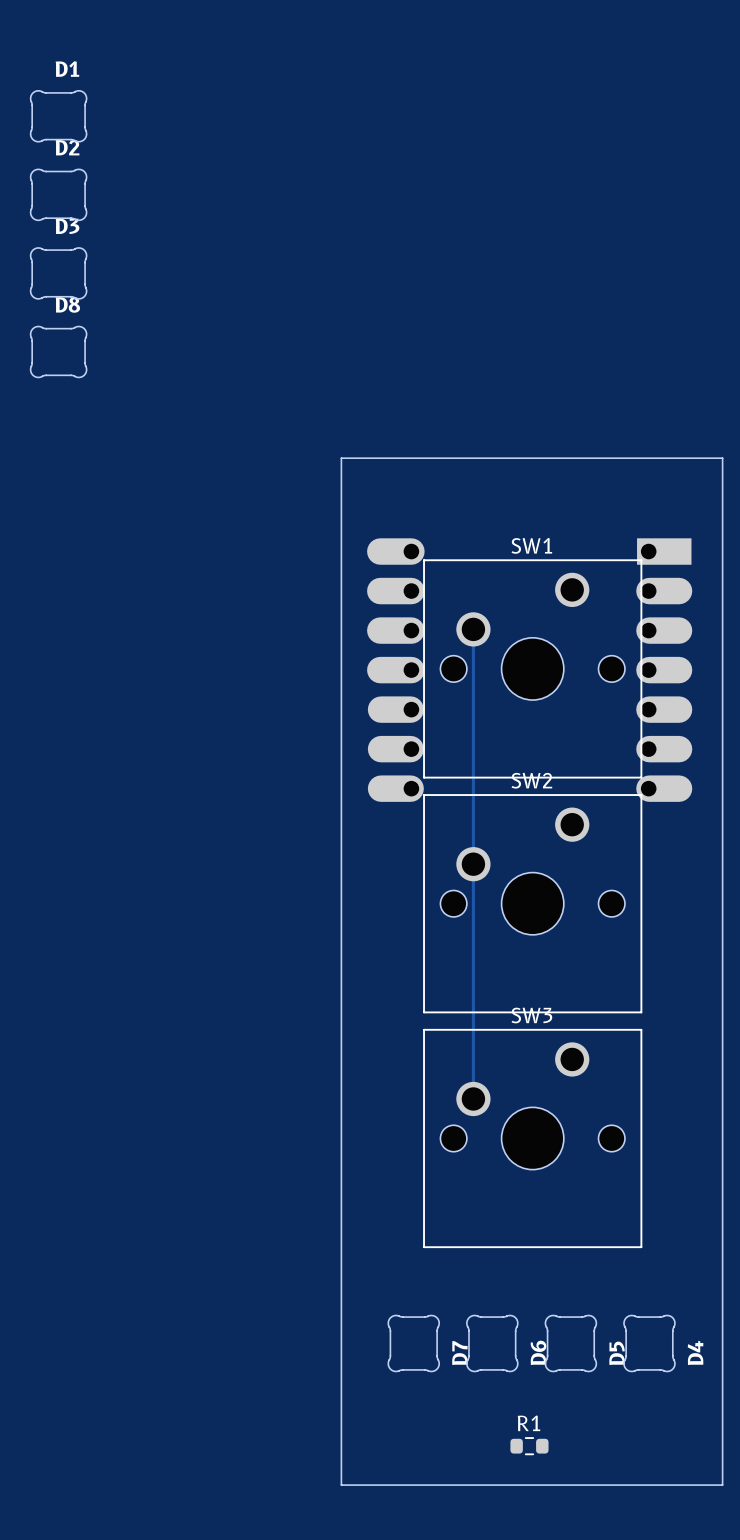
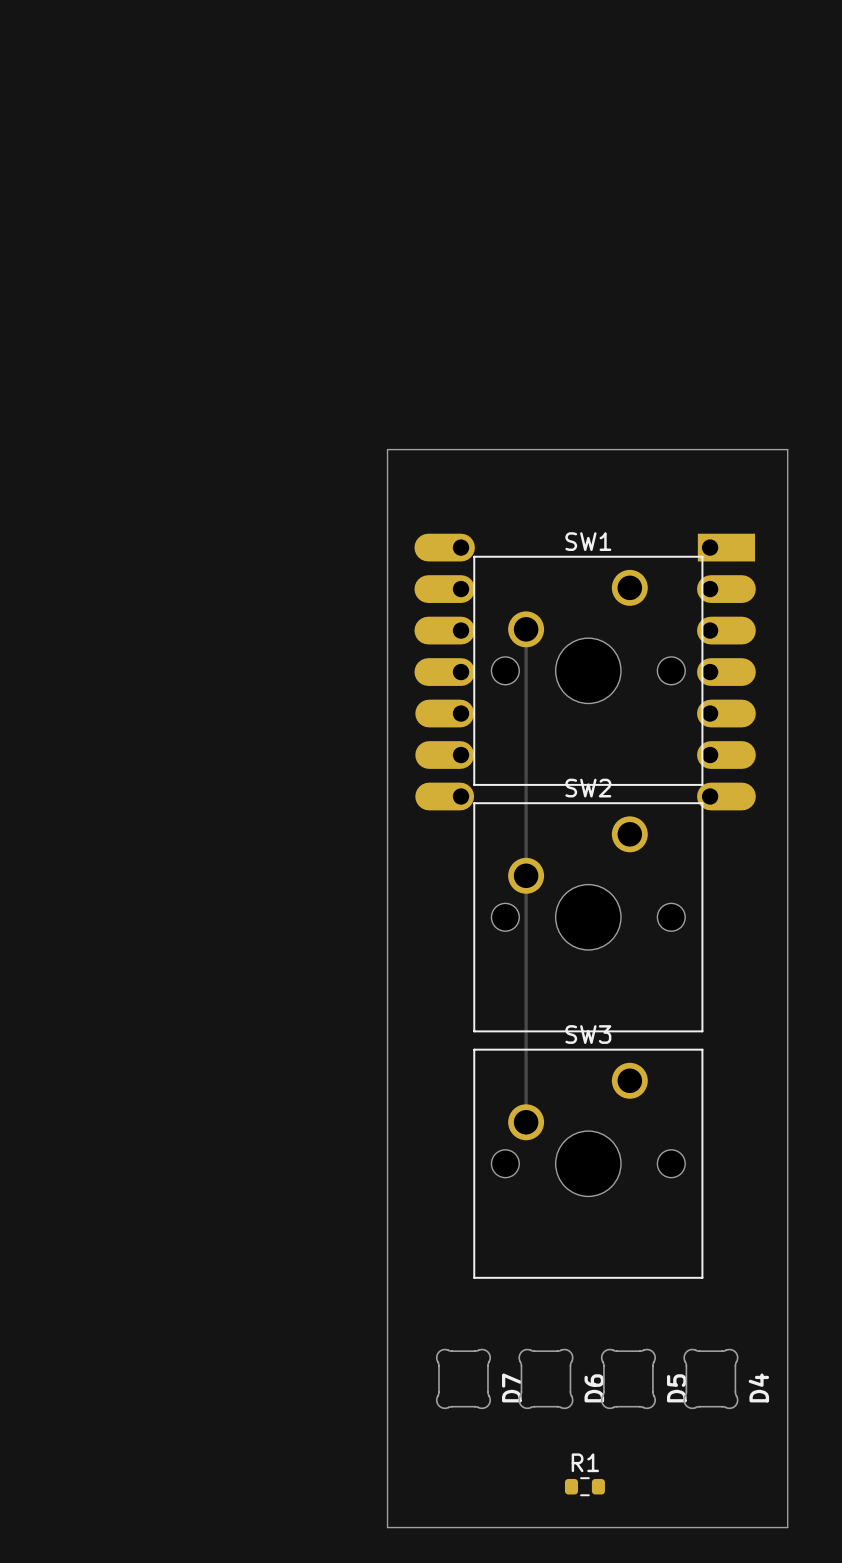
D1: (58, 116) -> none
D2: (58, 194) -> none
D3: (58, 273) -> none
D8: (58, 351) -> none

